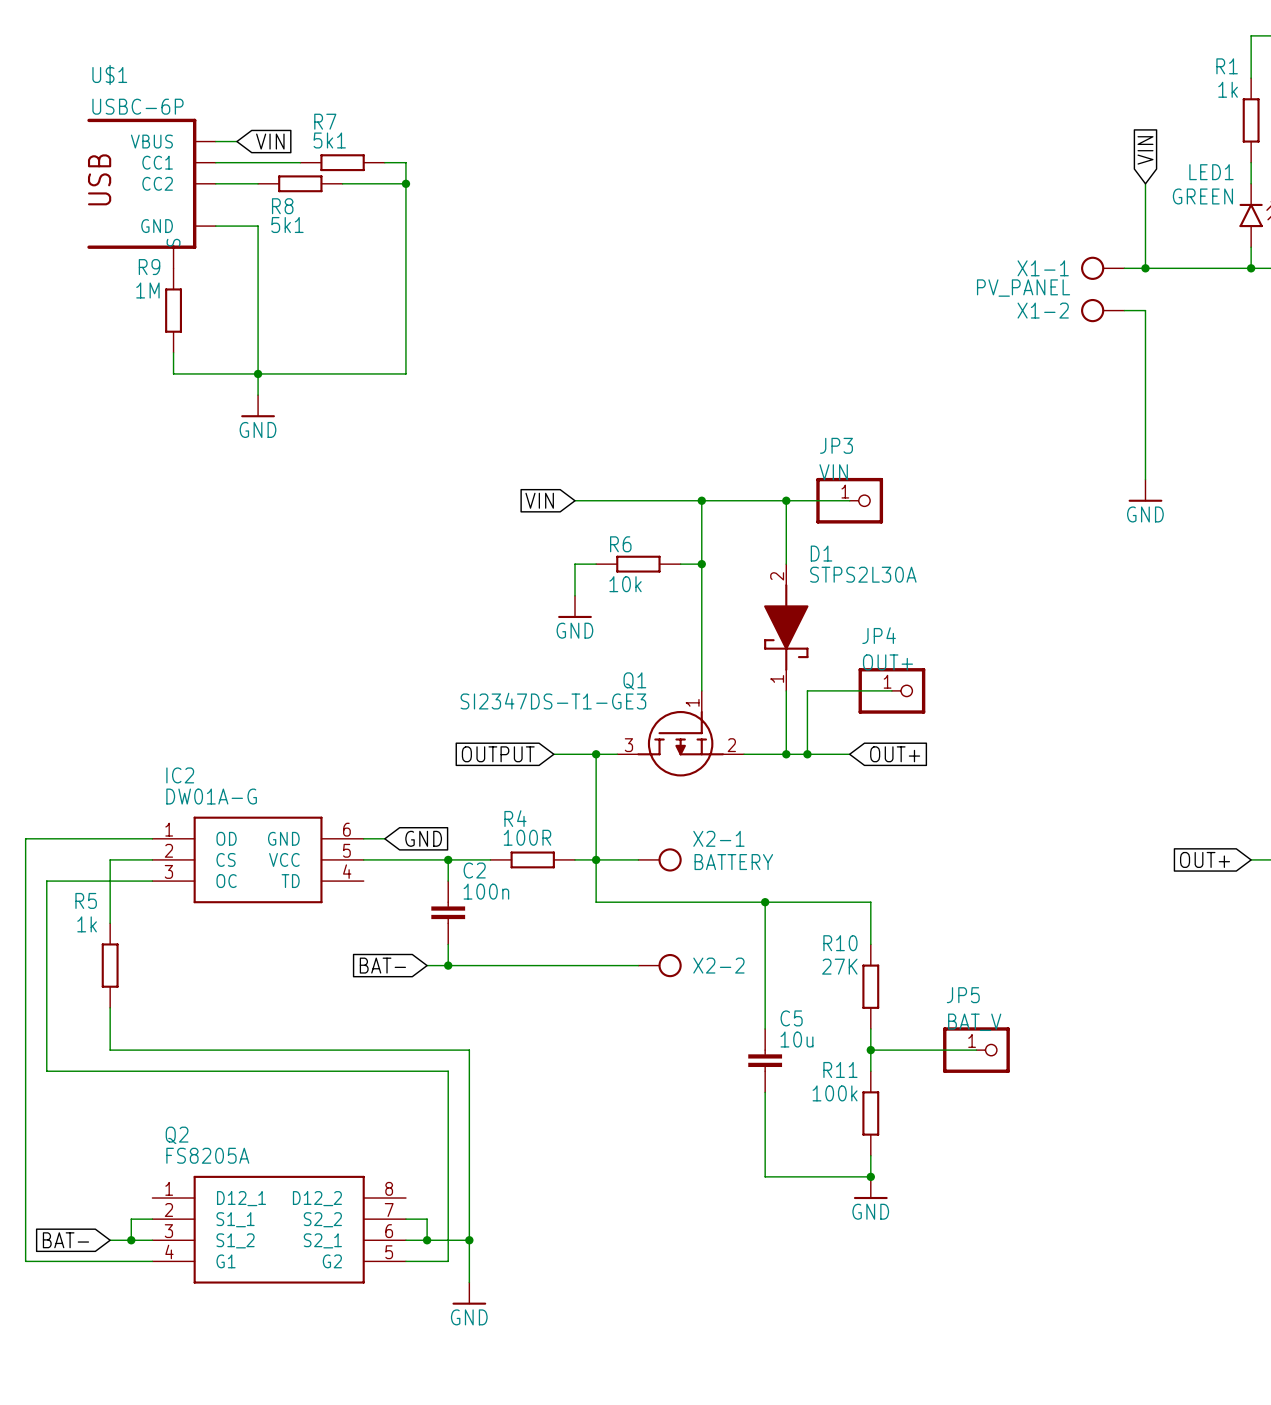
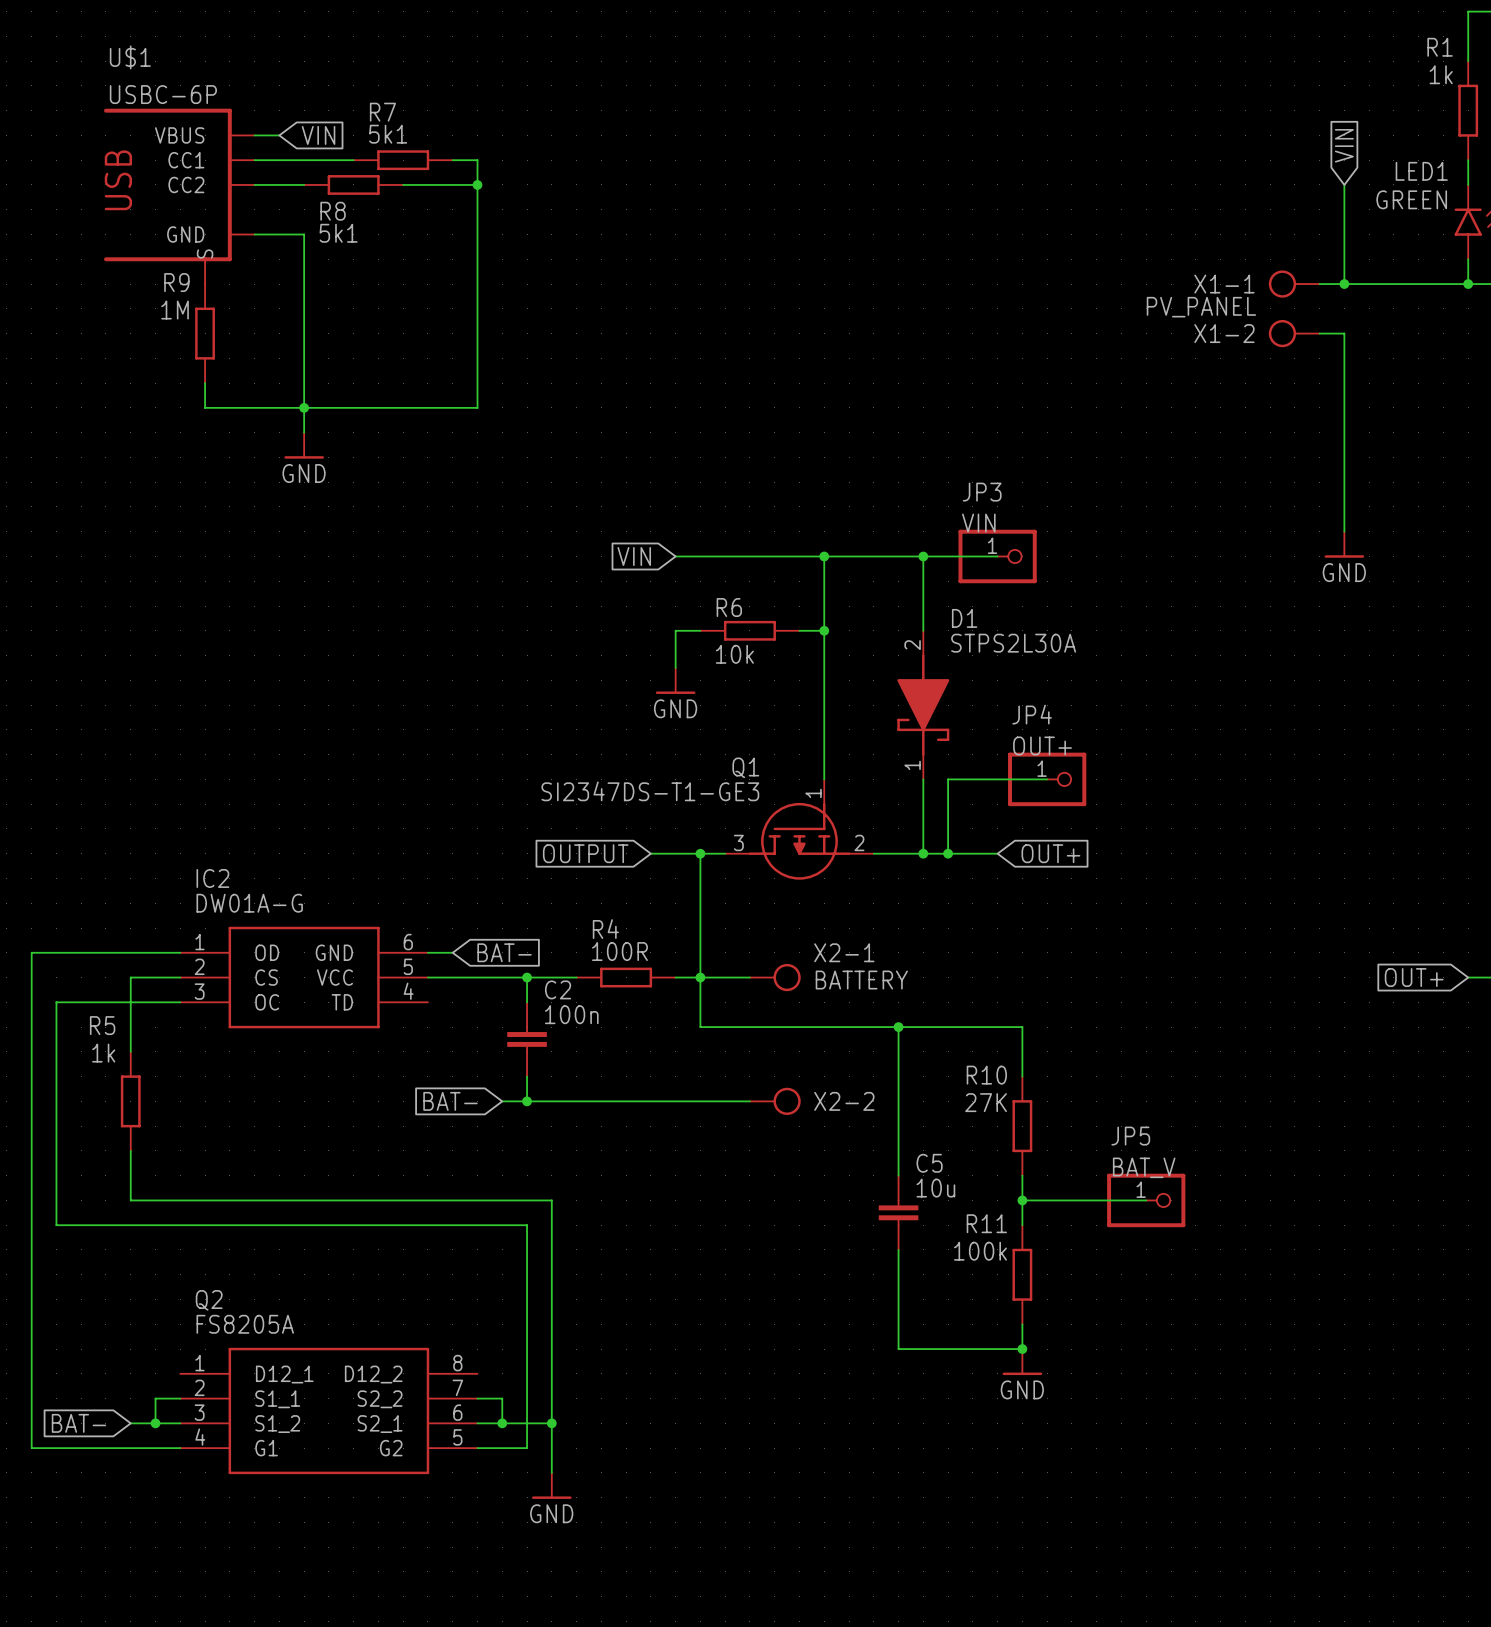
global label: GND (423, 838) -> BAT- (504, 952)

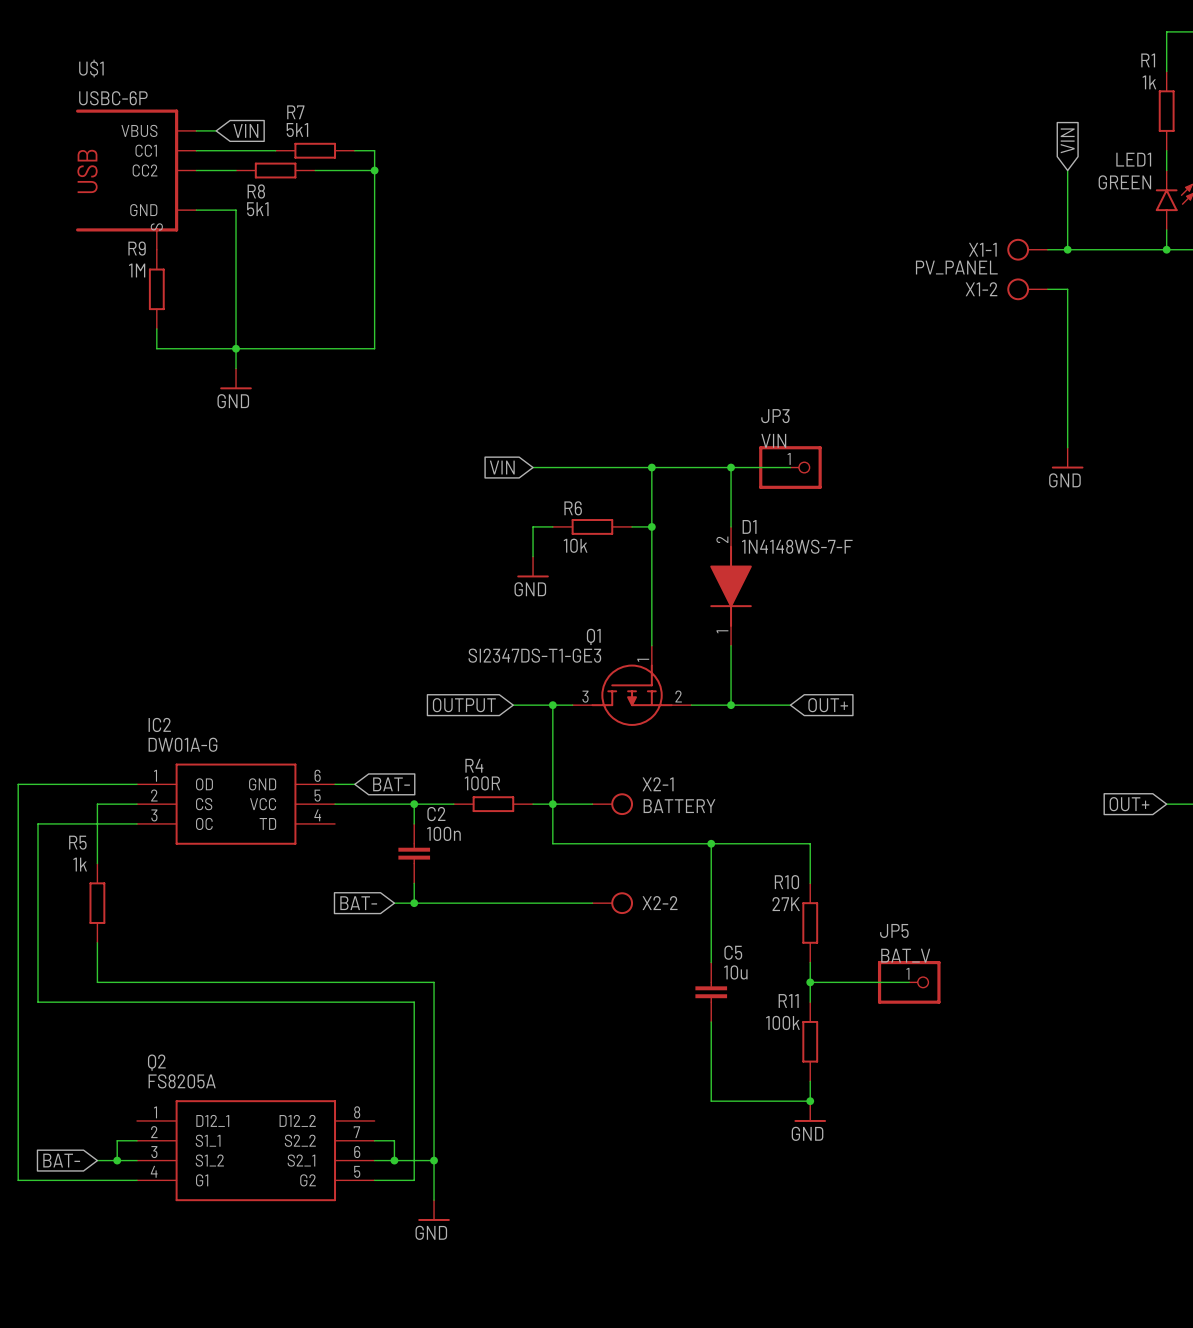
D1 symbol: [897, 630, 950, 780] -> [710, 526, 752, 646]
D1 value: STPS2L30A (1013, 643) -> 1N4148WS-7-F (797, 546)
wire: (1047, 779) (948, 779) (948, 853) -> none
JP4: OUT+ (1047, 779) -> none
junction: (948, 853) -> none

